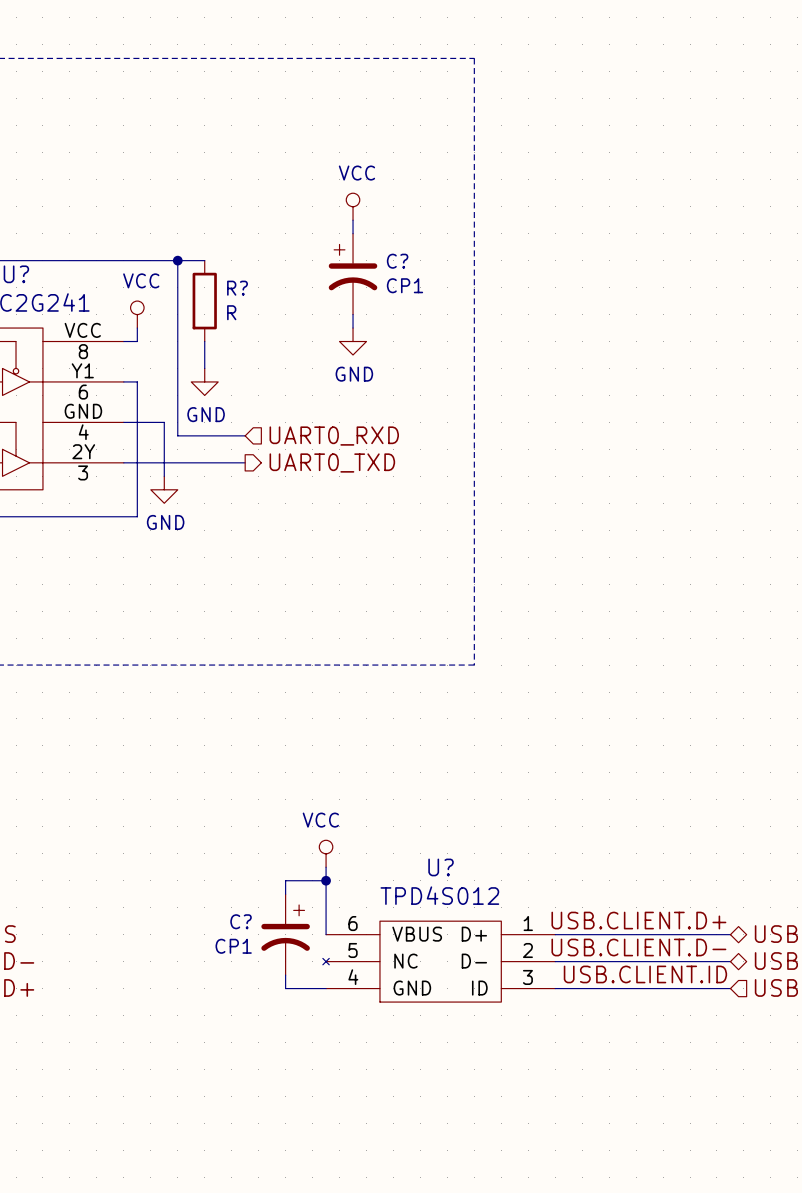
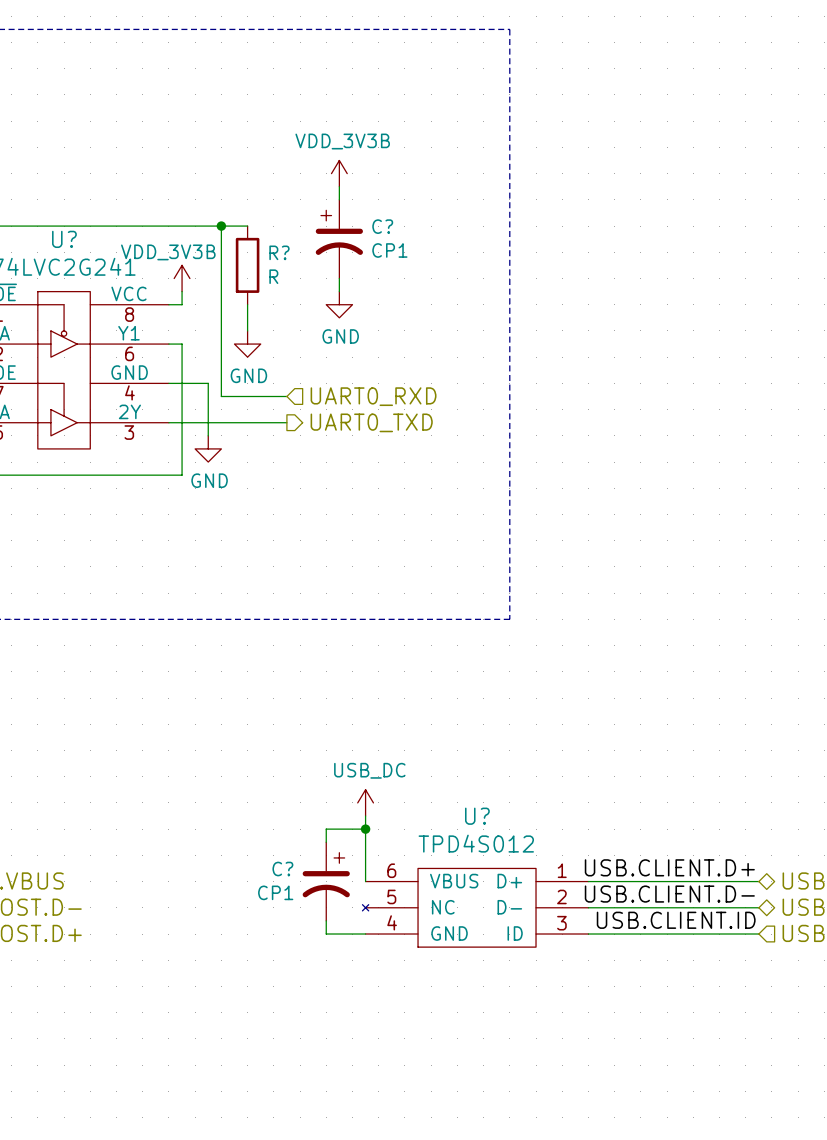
power symbol: none -> VDD_3V3B (339, 173)
power symbol: VCC (353, 206) -> none
wire: (353, 220) (353, 233) -> (339, 186) (339, 199)
C? position: (353, 274) -> (339, 239)
power symbol: VCC (137, 314) -> VDD_3V3B (182, 278)
wire: (353, 314) (353, 328) -> (339, 278) (339, 291)
power symbol position: GND (353, 341) -> GND (339, 304)
power symbol: VCC (326, 853) -> USB_DC (365, 802)

